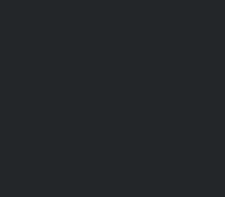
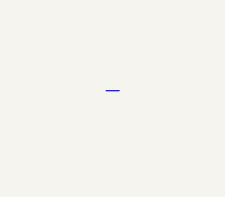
line: none -> (106, 90) (119, 90)

